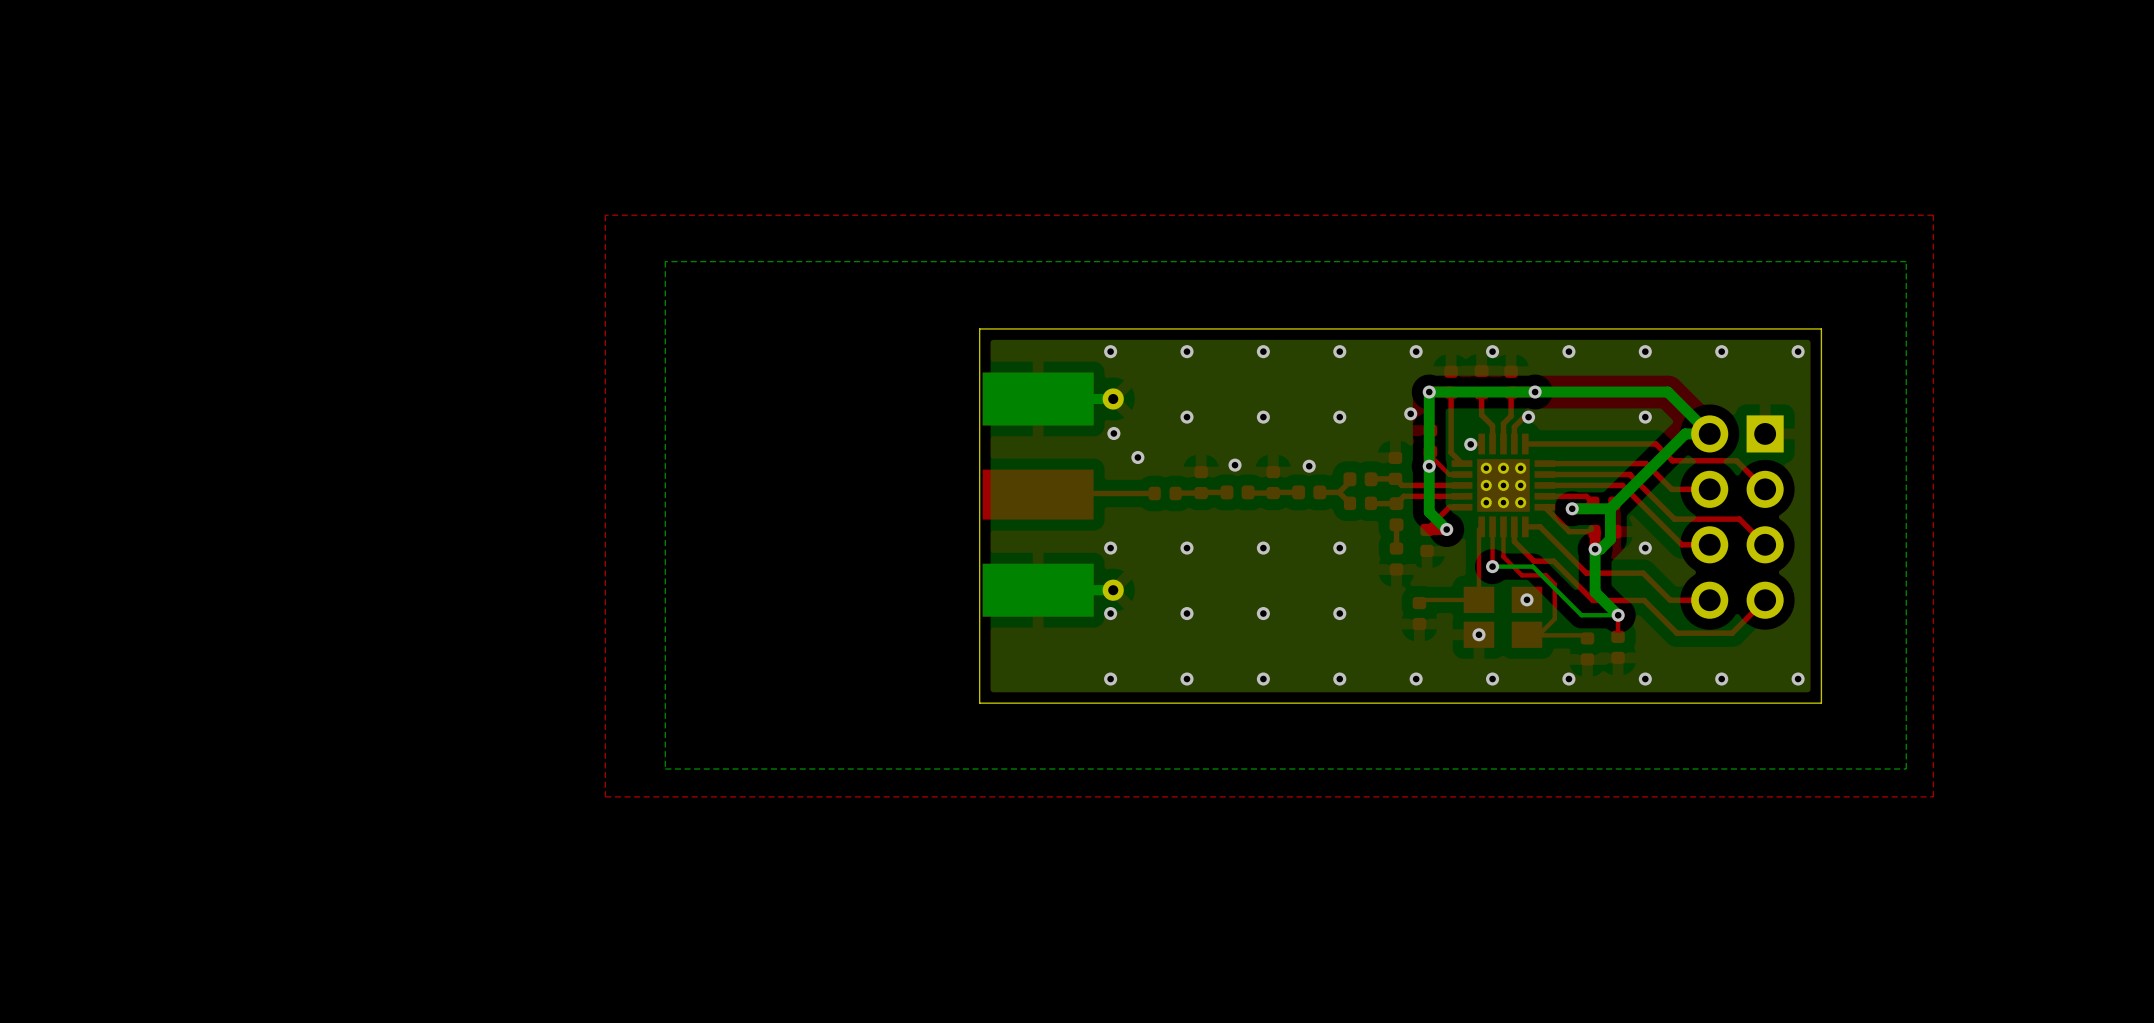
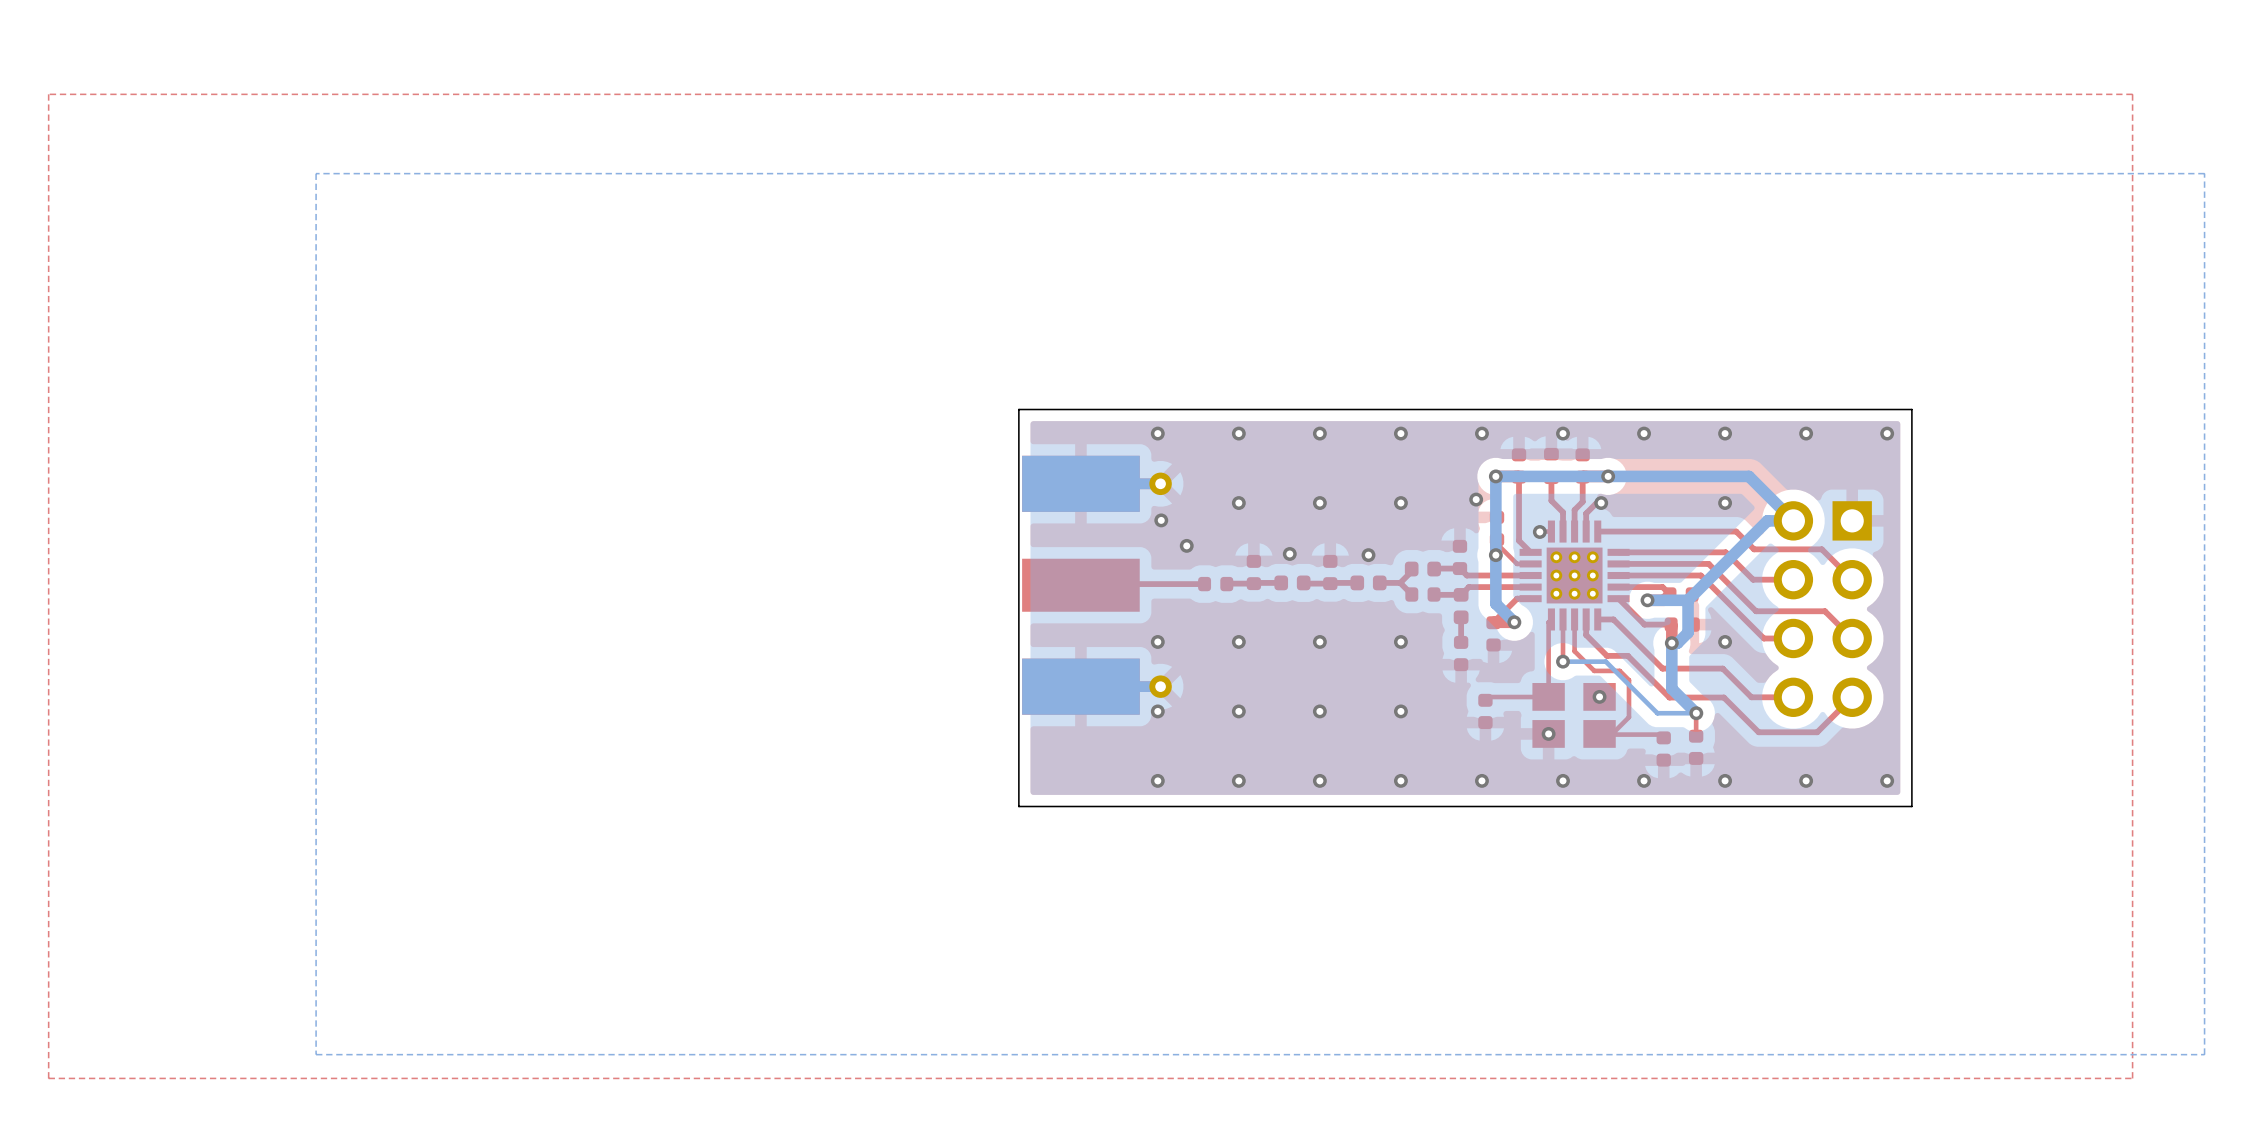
top zone outline: none -> (2132, 94) (2132, 1078) (48, 1078) (48, 94) (2132, 94)
bottom zone outline: none -> (2204, 173) (316, 173) (316, 1054) (2204, 1054) (2204, 173)
top zone outline: (1933, 215) (1933, 796) (605, 796) (605, 215) (1933, 215) -> none
bottom zone outline: (1906, 261) (665, 261) (665, 769) (1906, 769) (1906, 261) -> none

